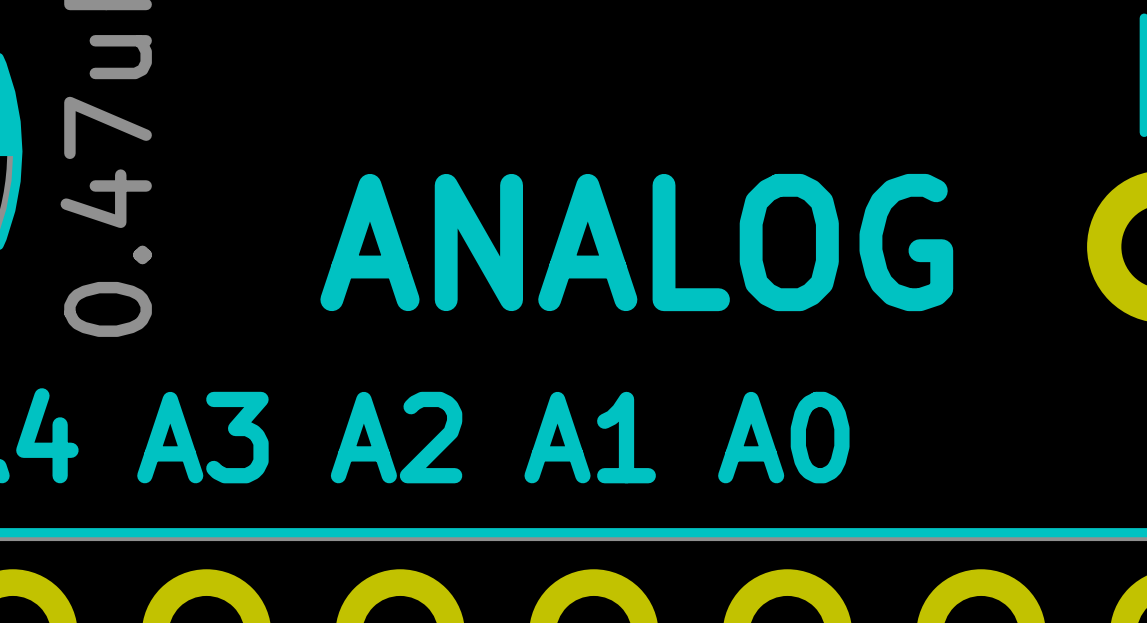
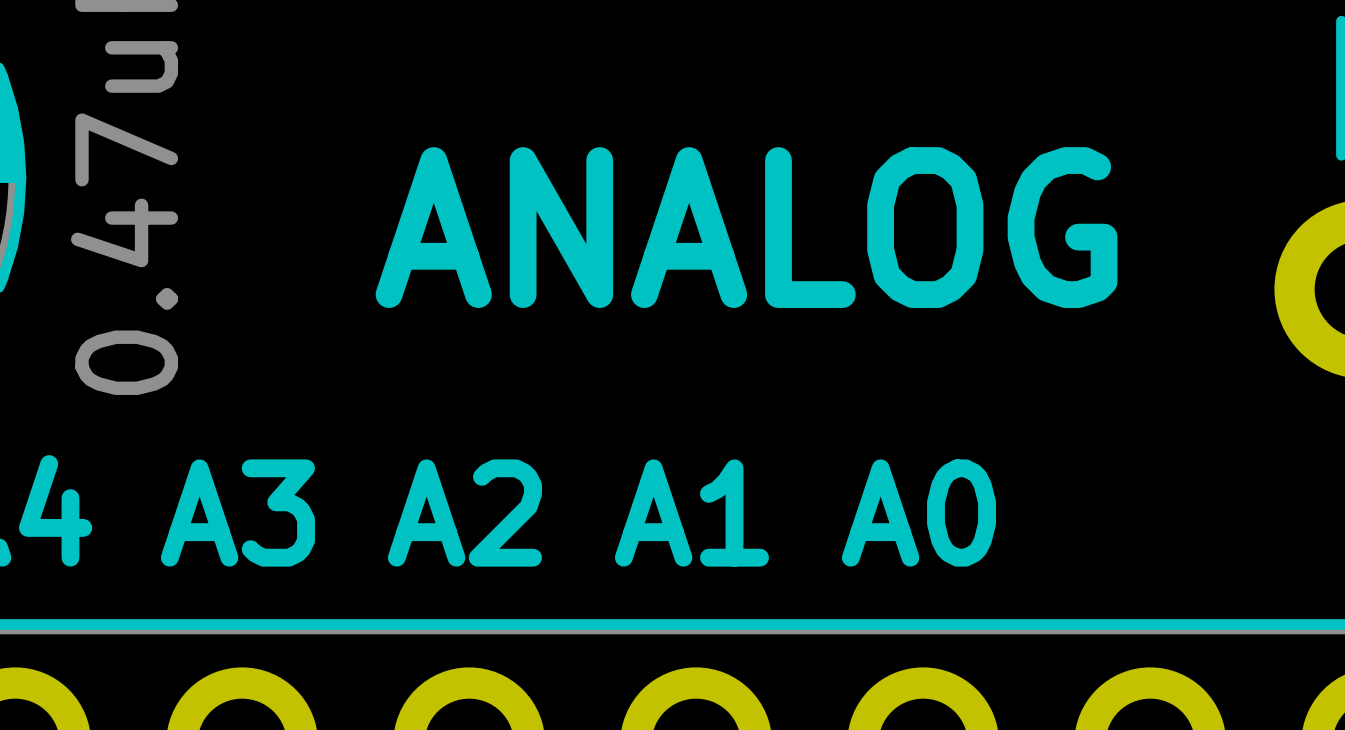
text position: ANALOG (636, 242) -> ANALOG (746, 227)

